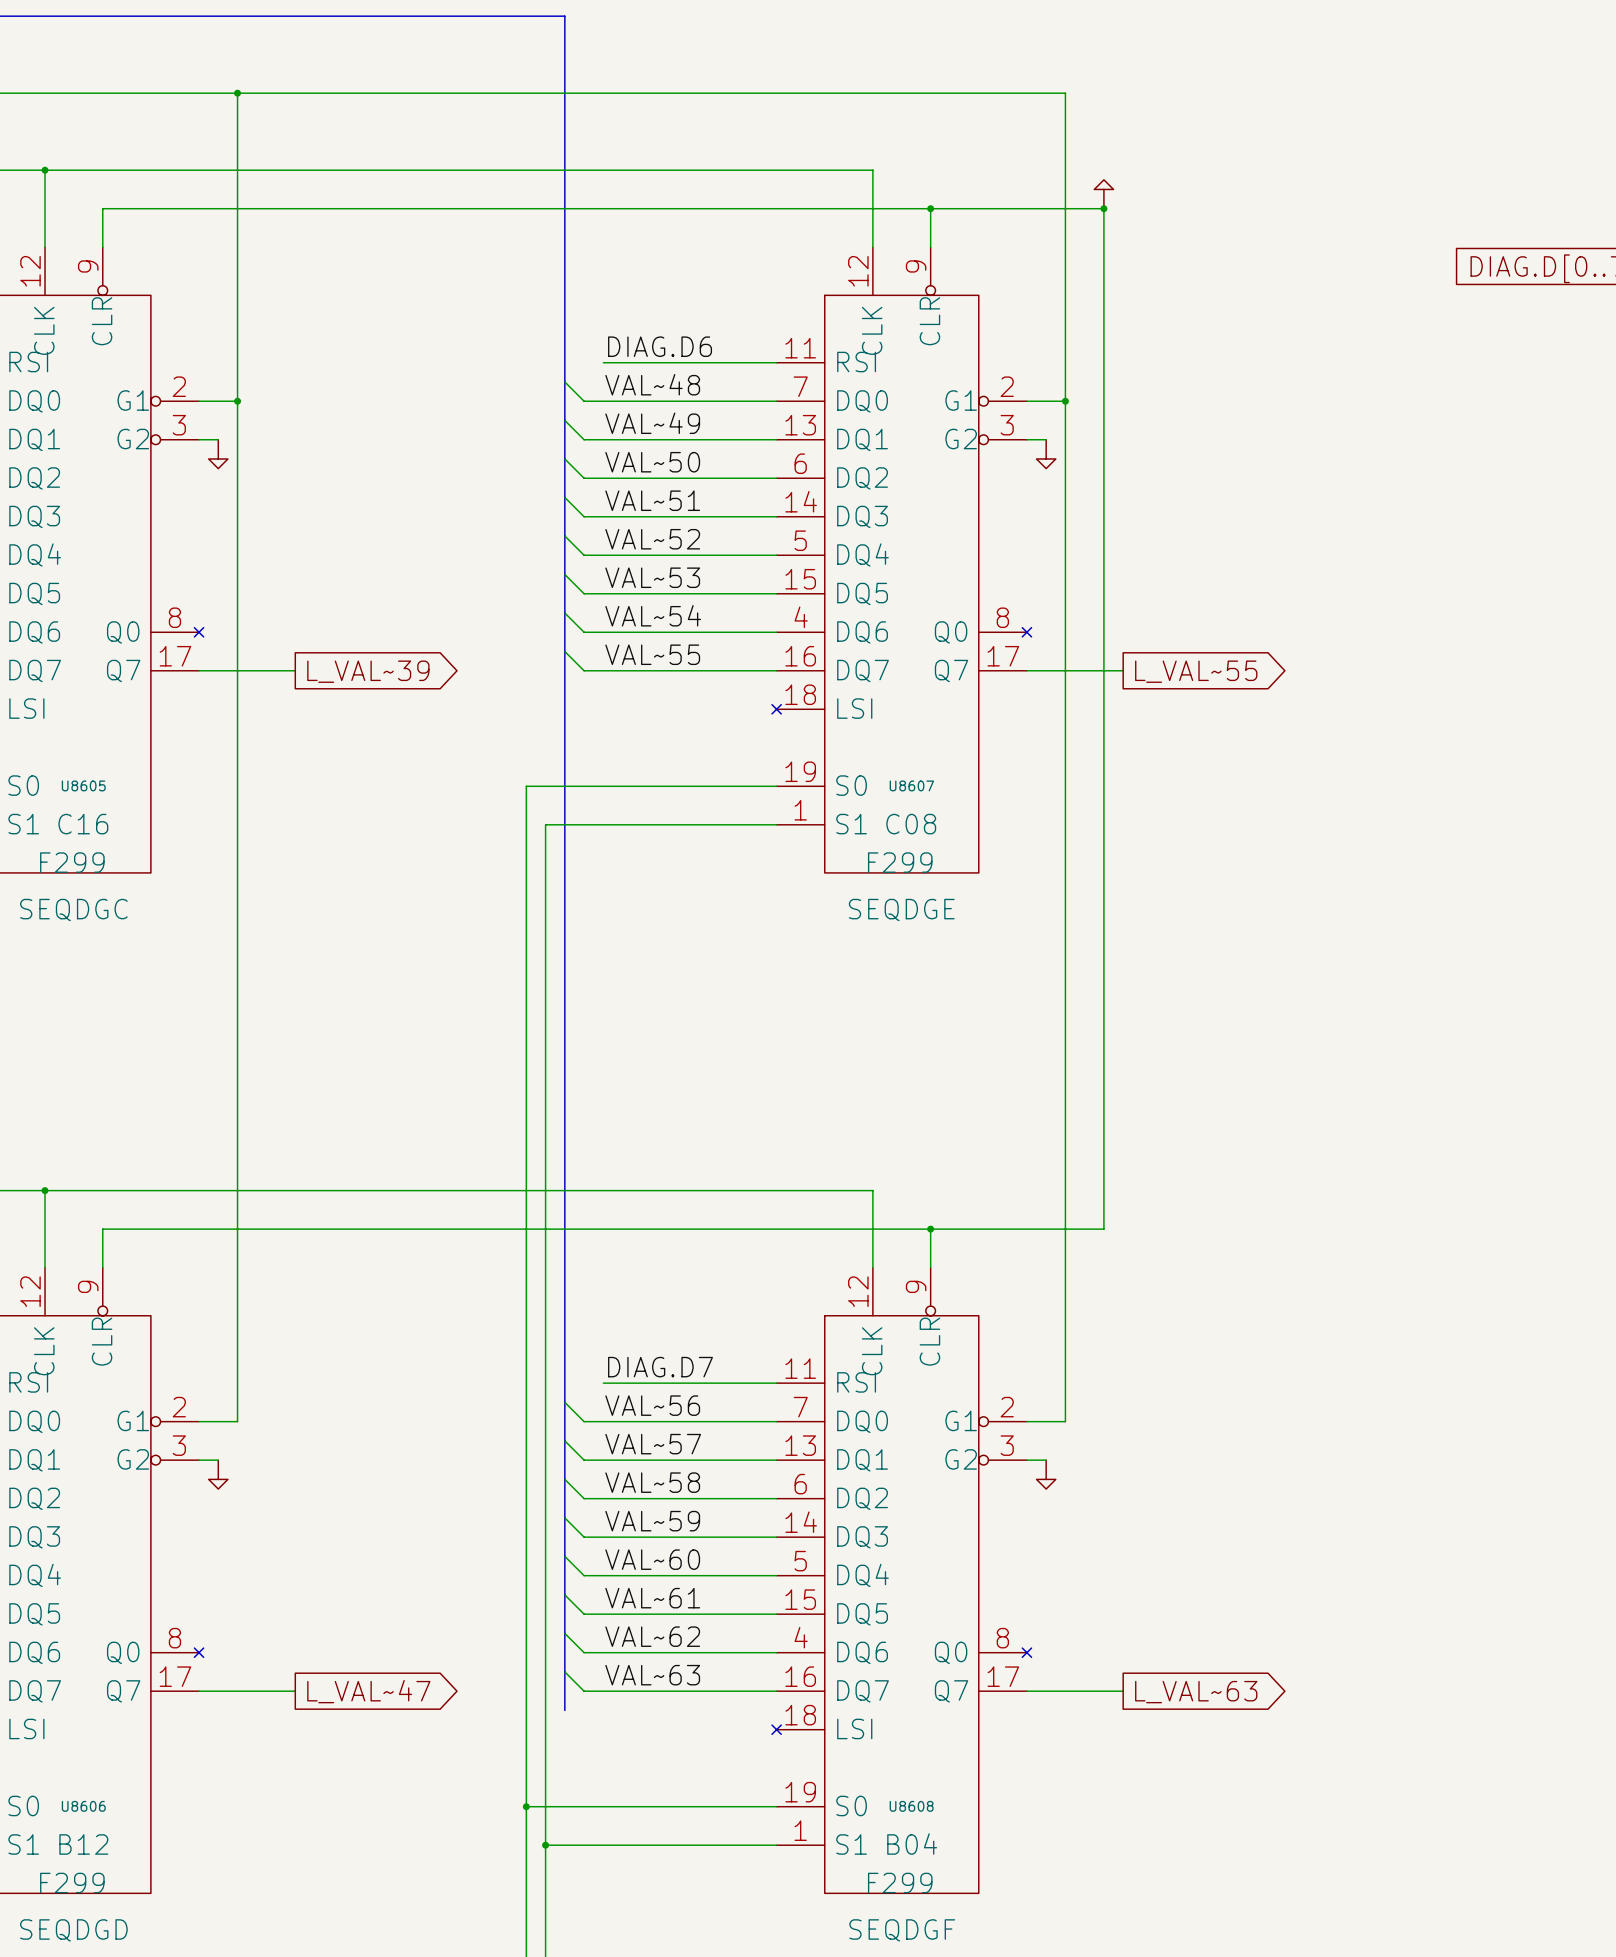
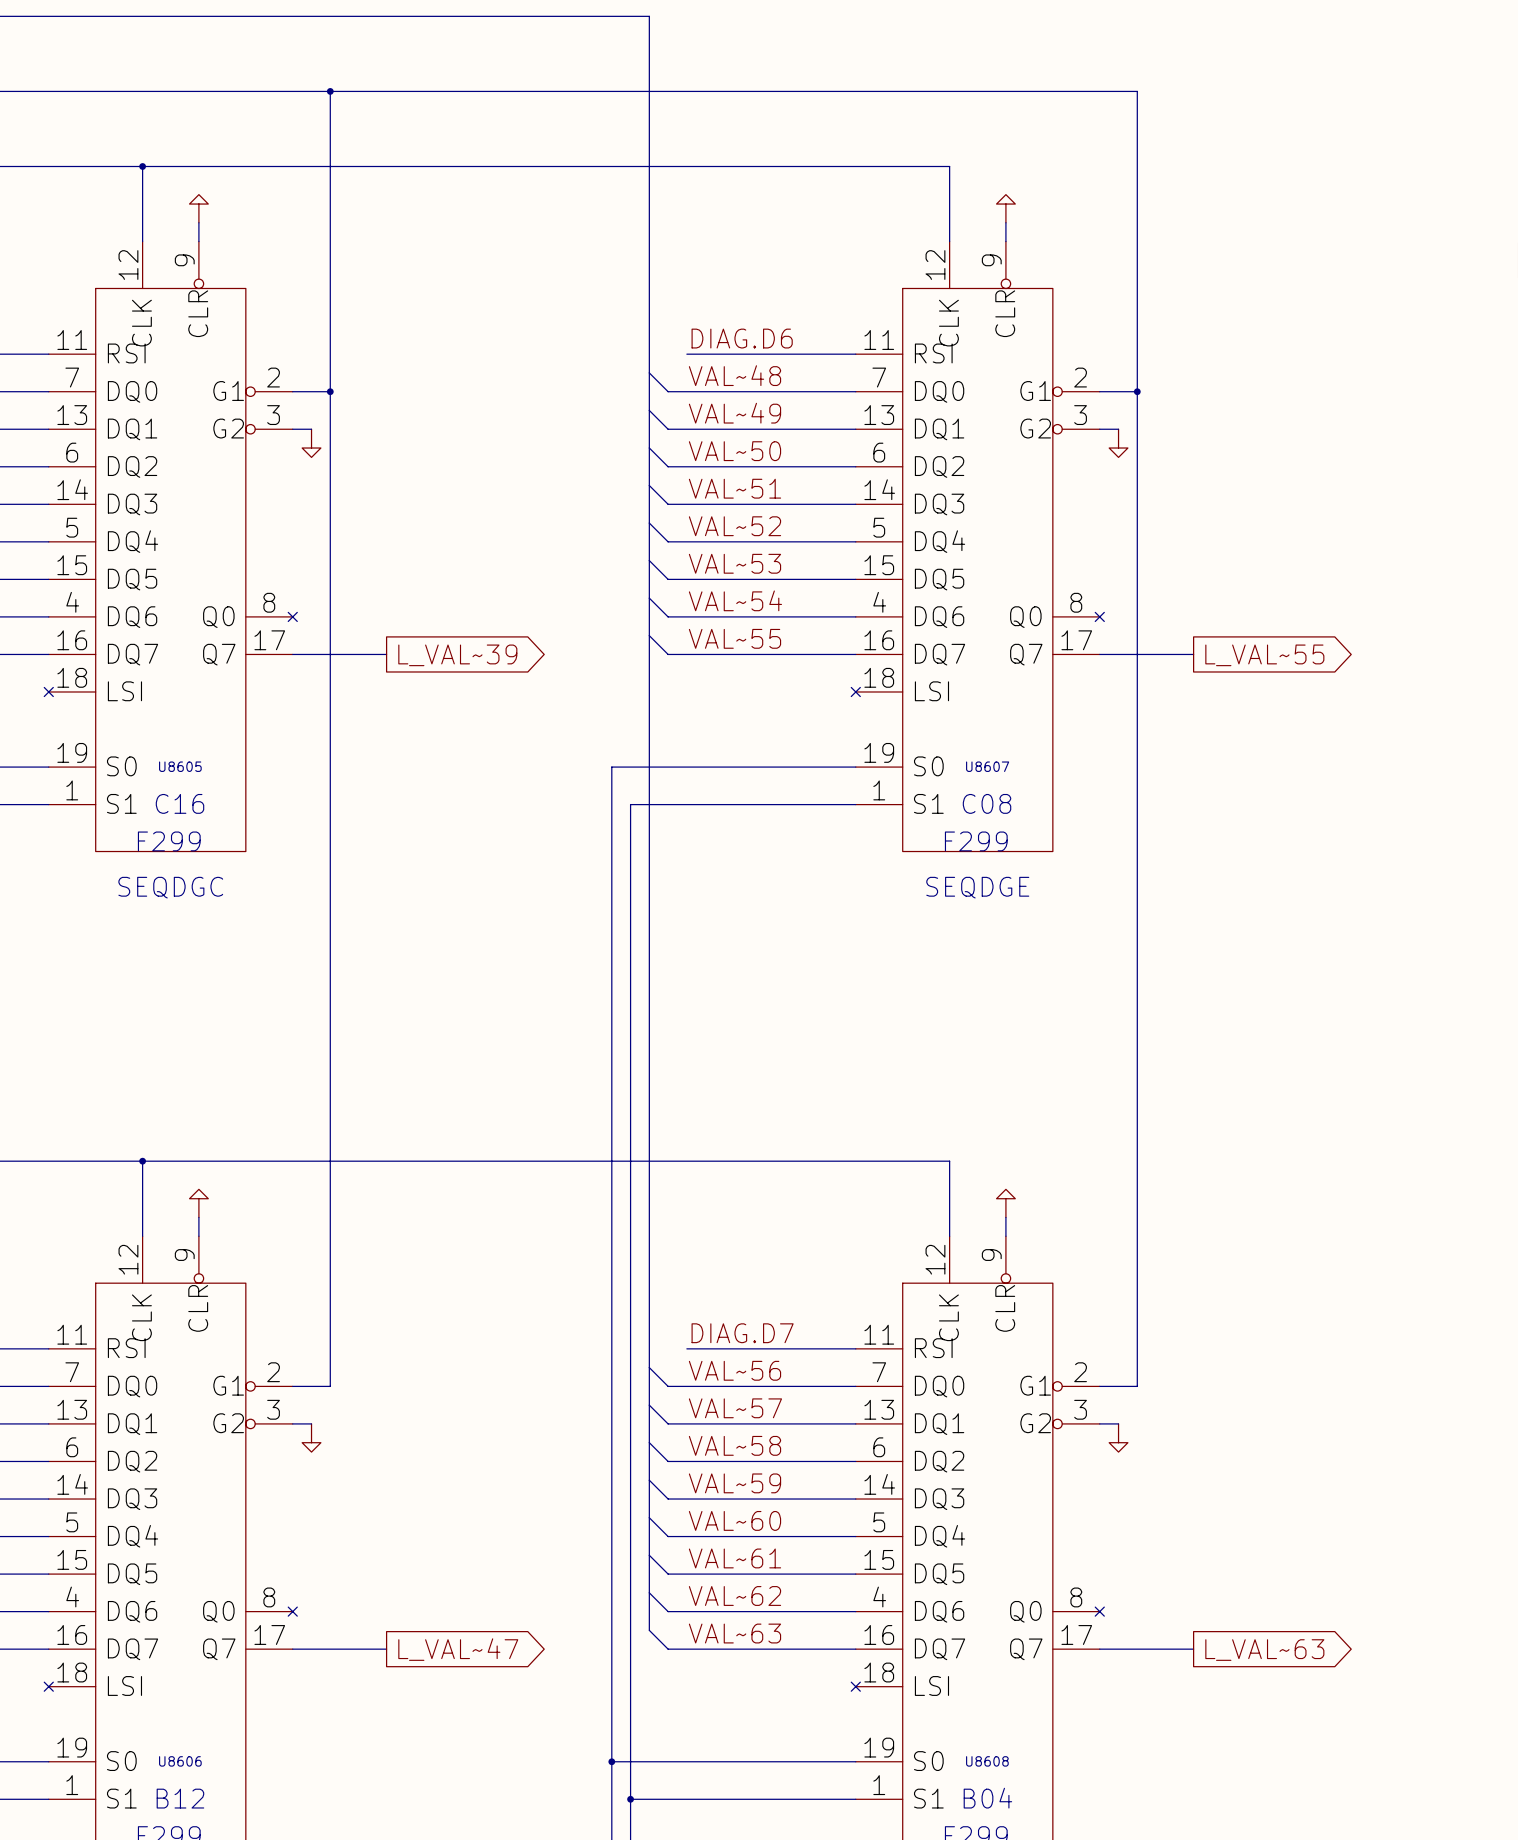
power symbol position: (1103, 193) -> (1005, 208)
junction: (930, 208) -> none
junction: (1103, 208) -> none
power symbol: none -> (198, 208)
wire: (102, 227) (102, 208) (1103, 208) (1103, 1229) (102, 1229) (102, 1248) -> none
junction: (930, 1229) -> none
power symbol: none -> (198, 1203)
power symbol: none -> (1005, 1203)
bus: (564, 1671) (564, 1710) -> none

